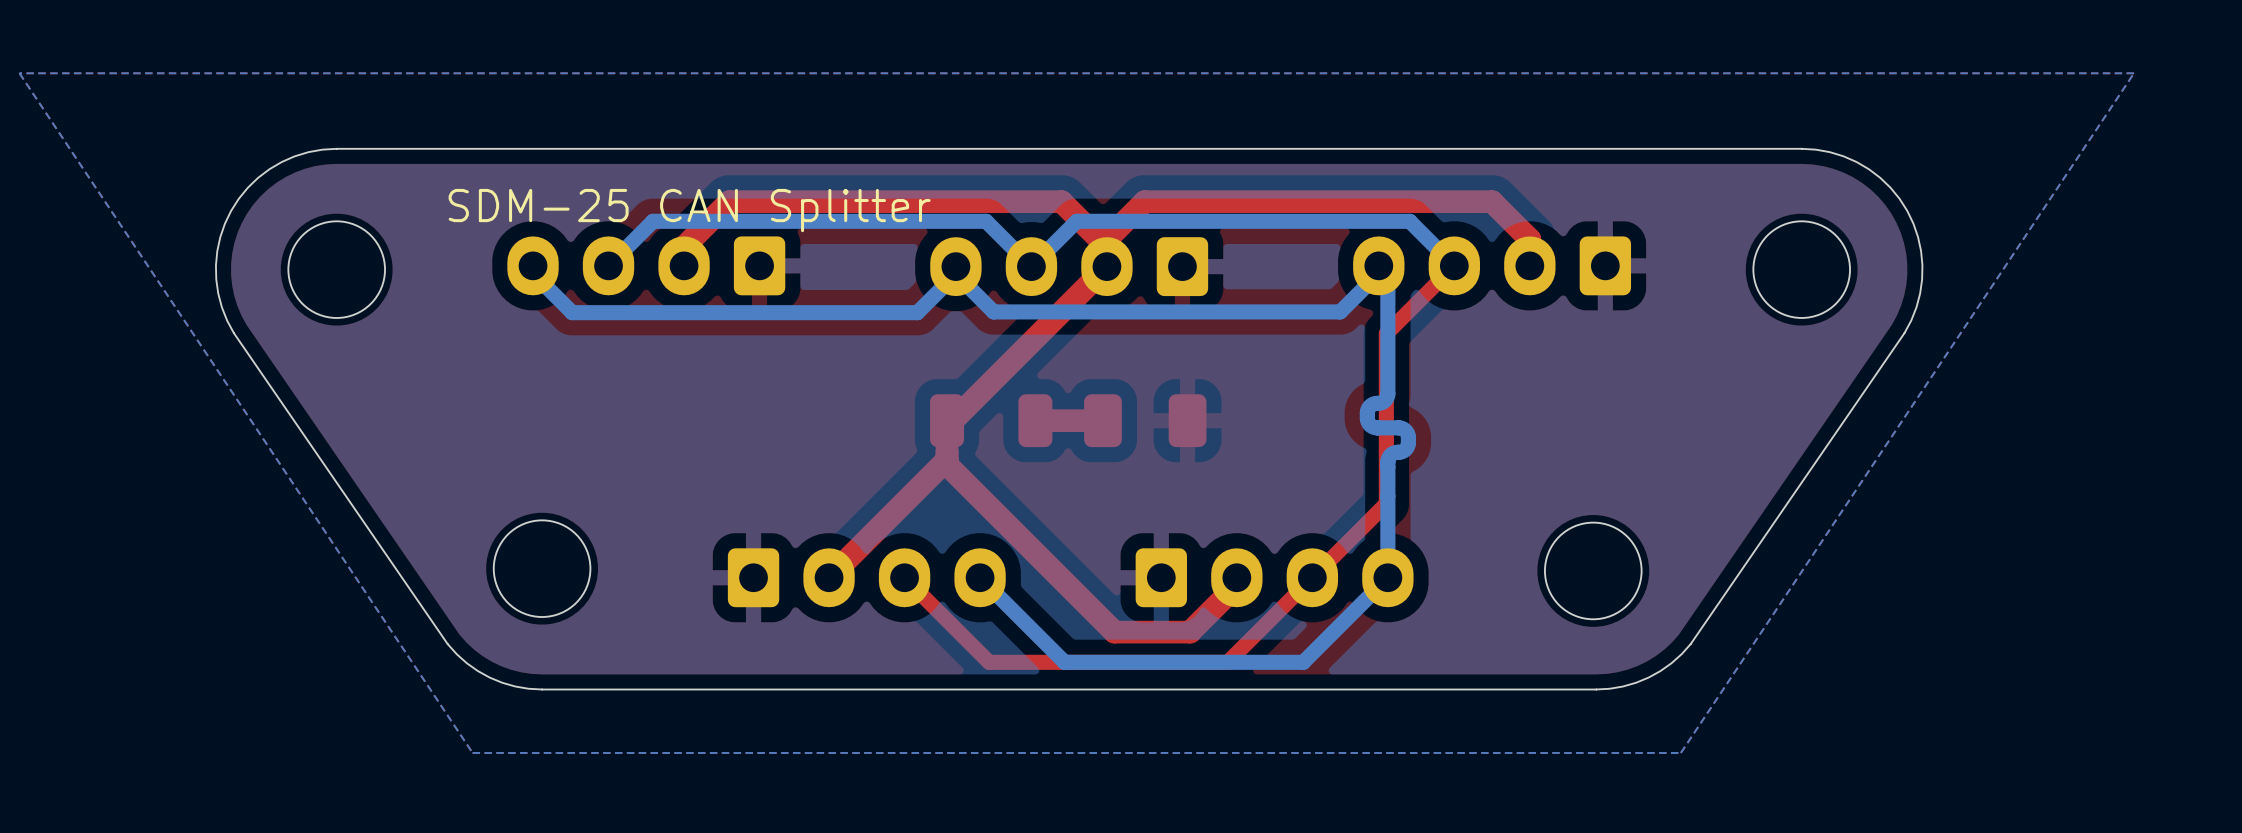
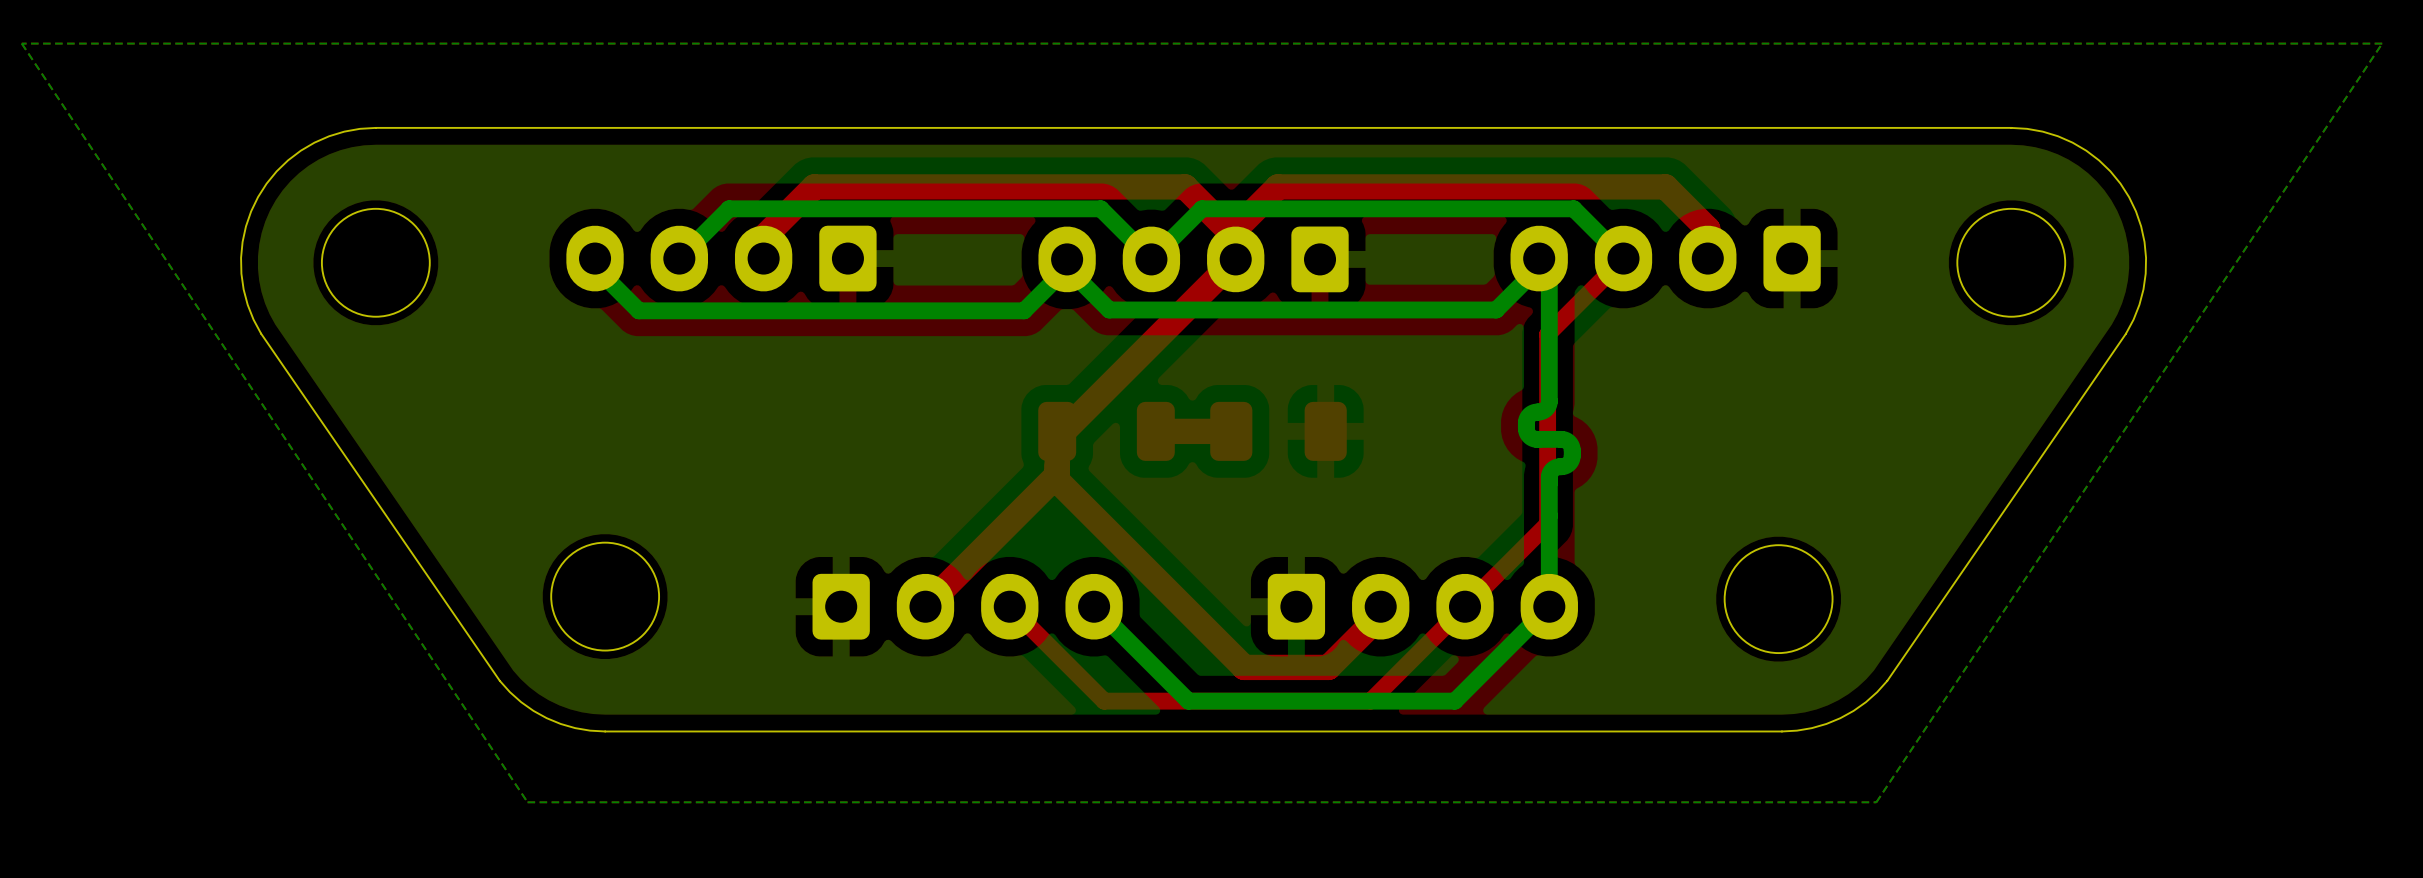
text: SDM-25 CAN Splitter (689, 210) -> none

